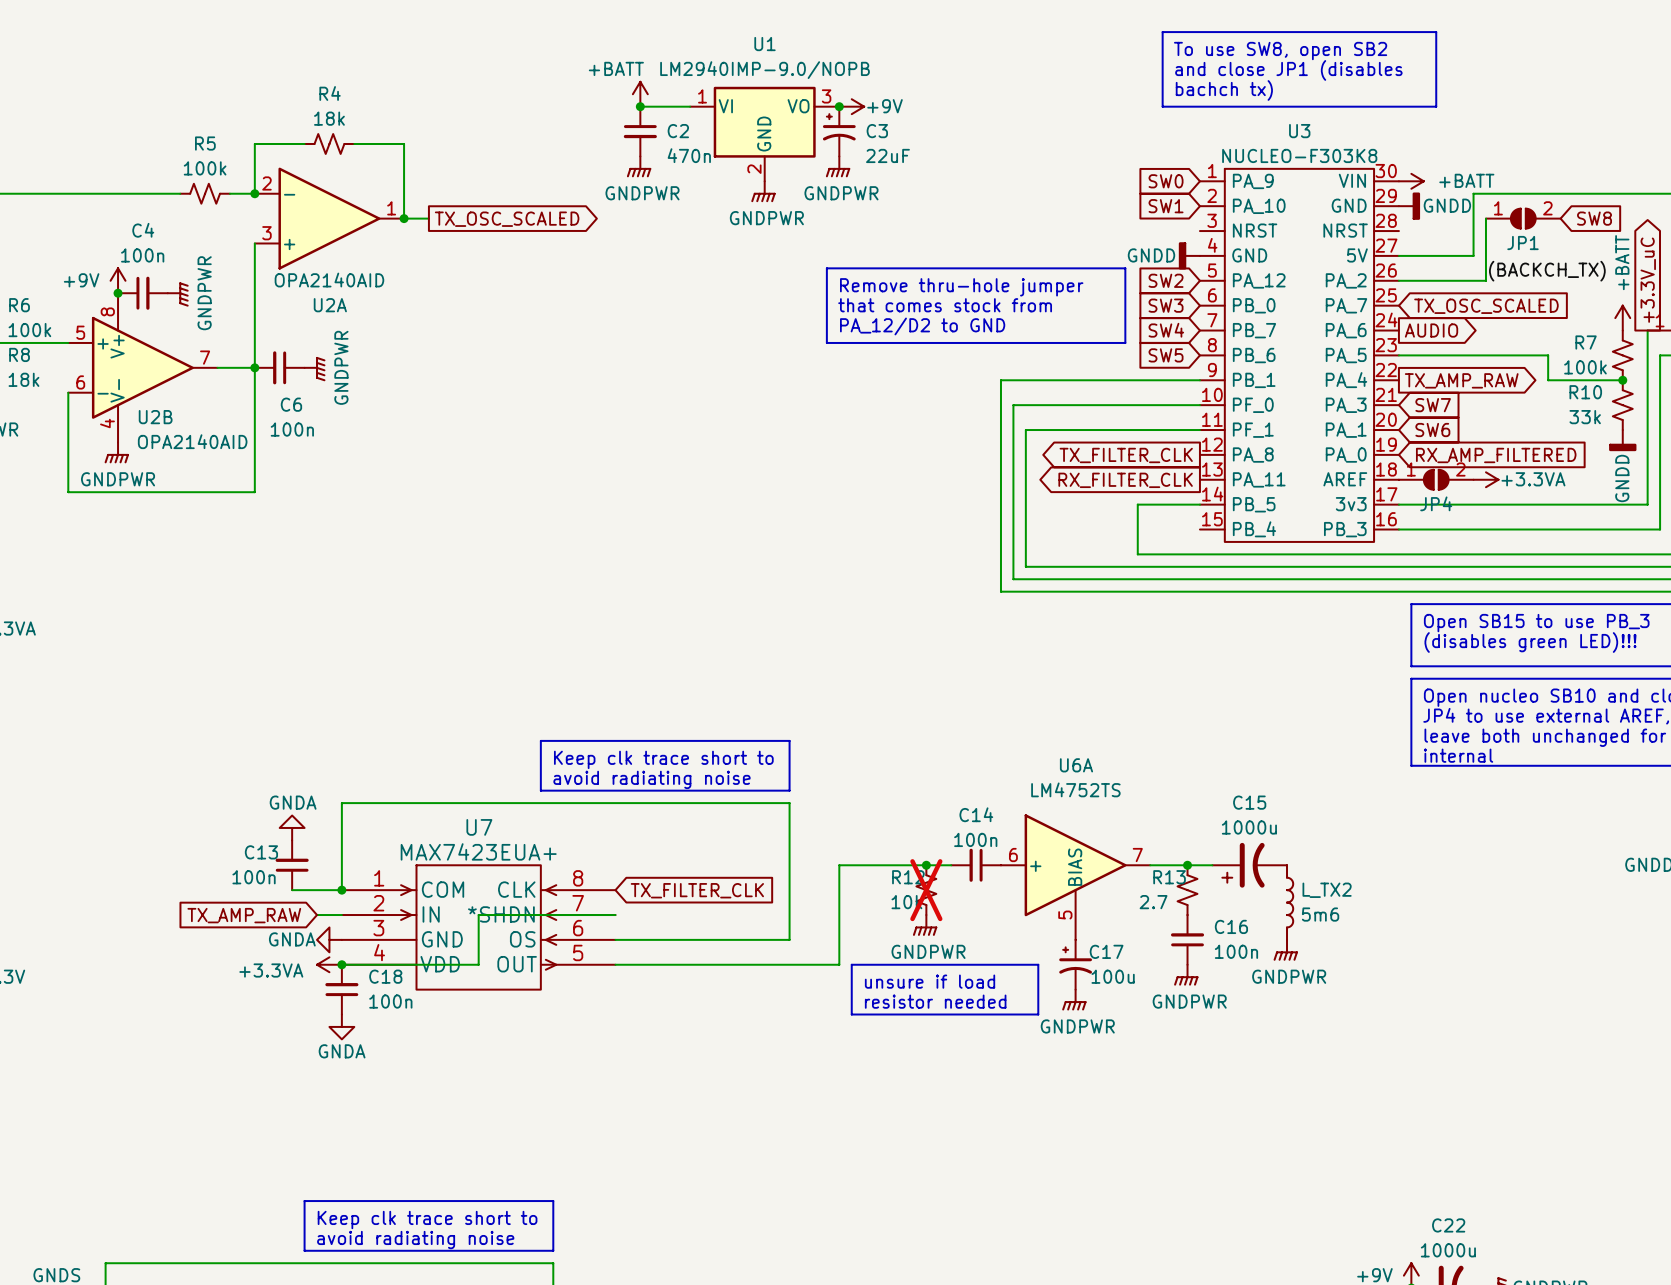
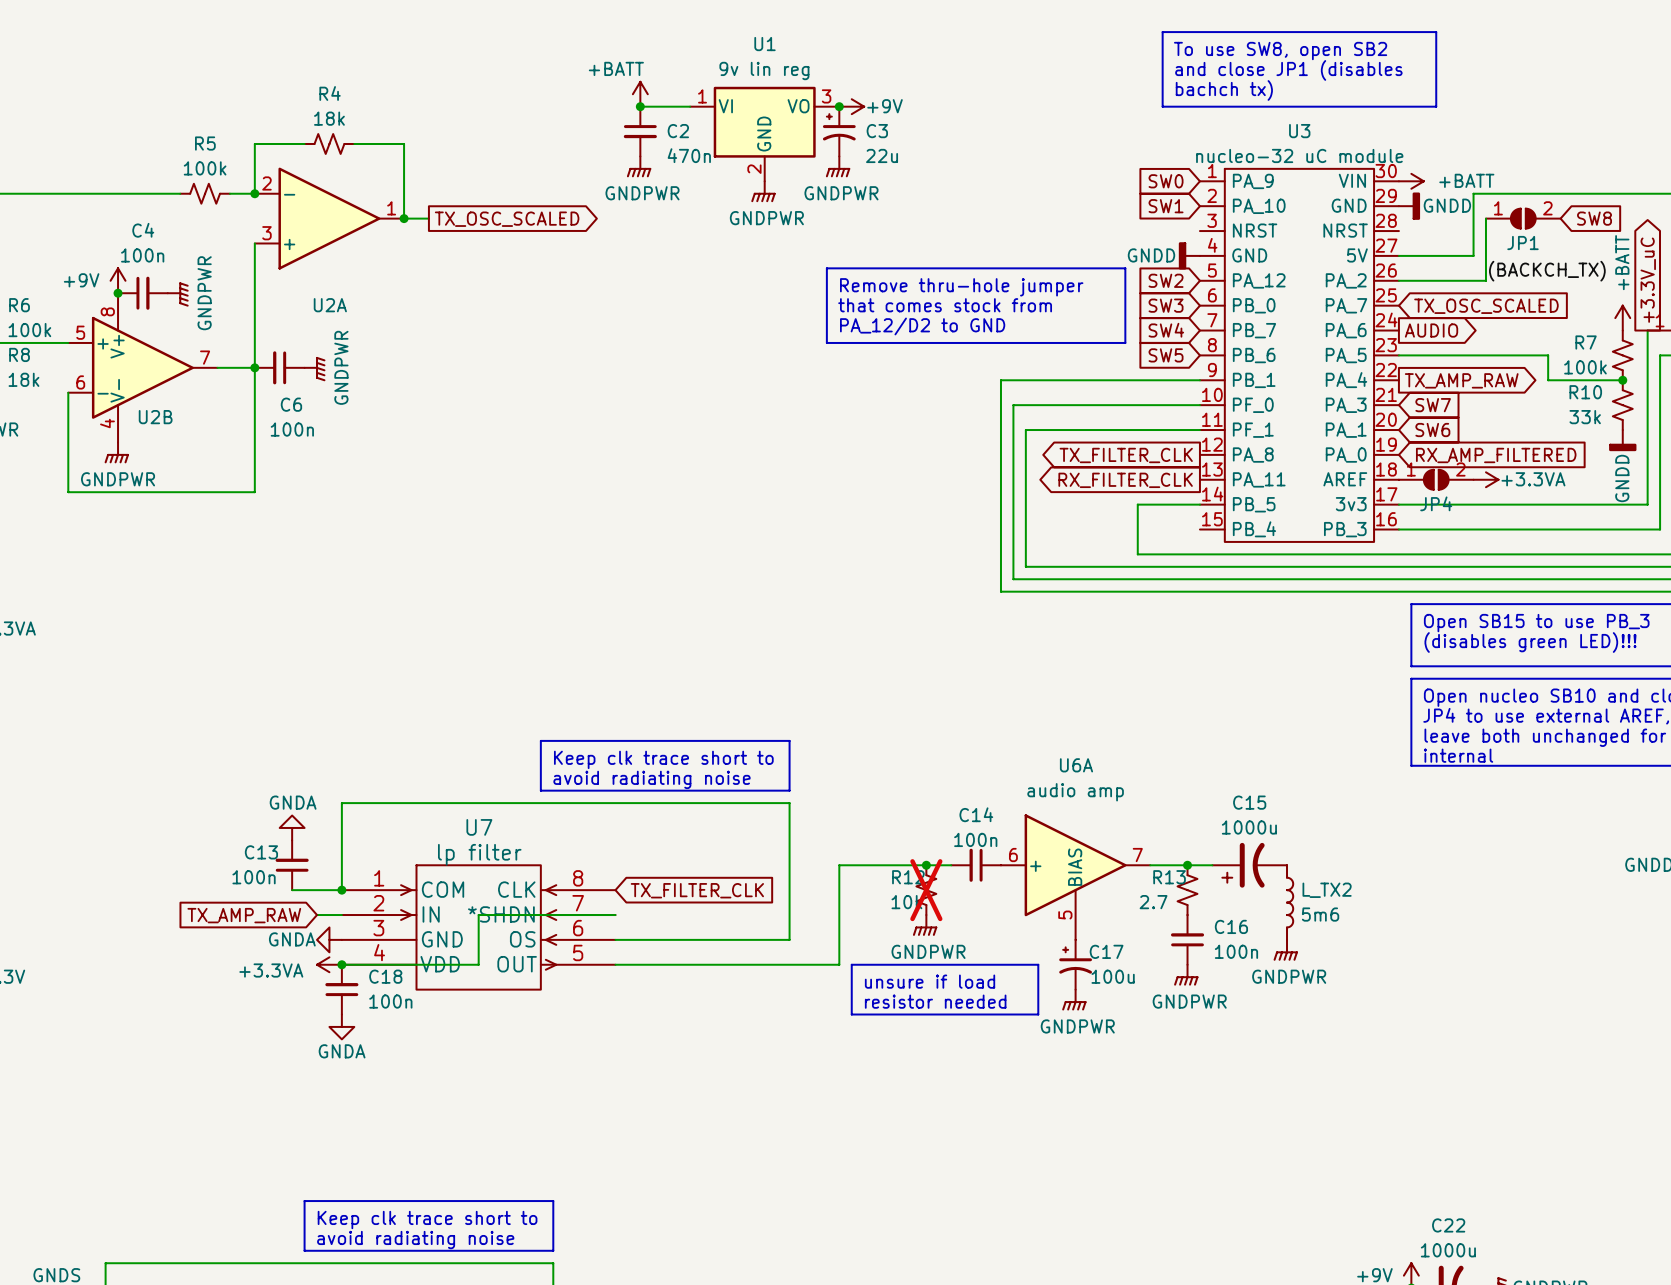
U1 value: LM2940IMP-9.0/NOPB (765, 70) -> 9v lin reg (764, 70)
C3 value: 22uF (887, 155) -> 22u (882, 155)
U3 value: NUCLEO-F303K8 (1299, 155) -> nucleo-32 uC module (1299, 155)
U2A value: OPA2140AID (329, 280) -> none
U2B value: OPA2140AID (192, 441) -> none
U6A value: LM4752TS (1075, 789) -> audio amp (1075, 792)
U7 value: MAX7423EUA+ (478, 851) -> lp filter (479, 854)

